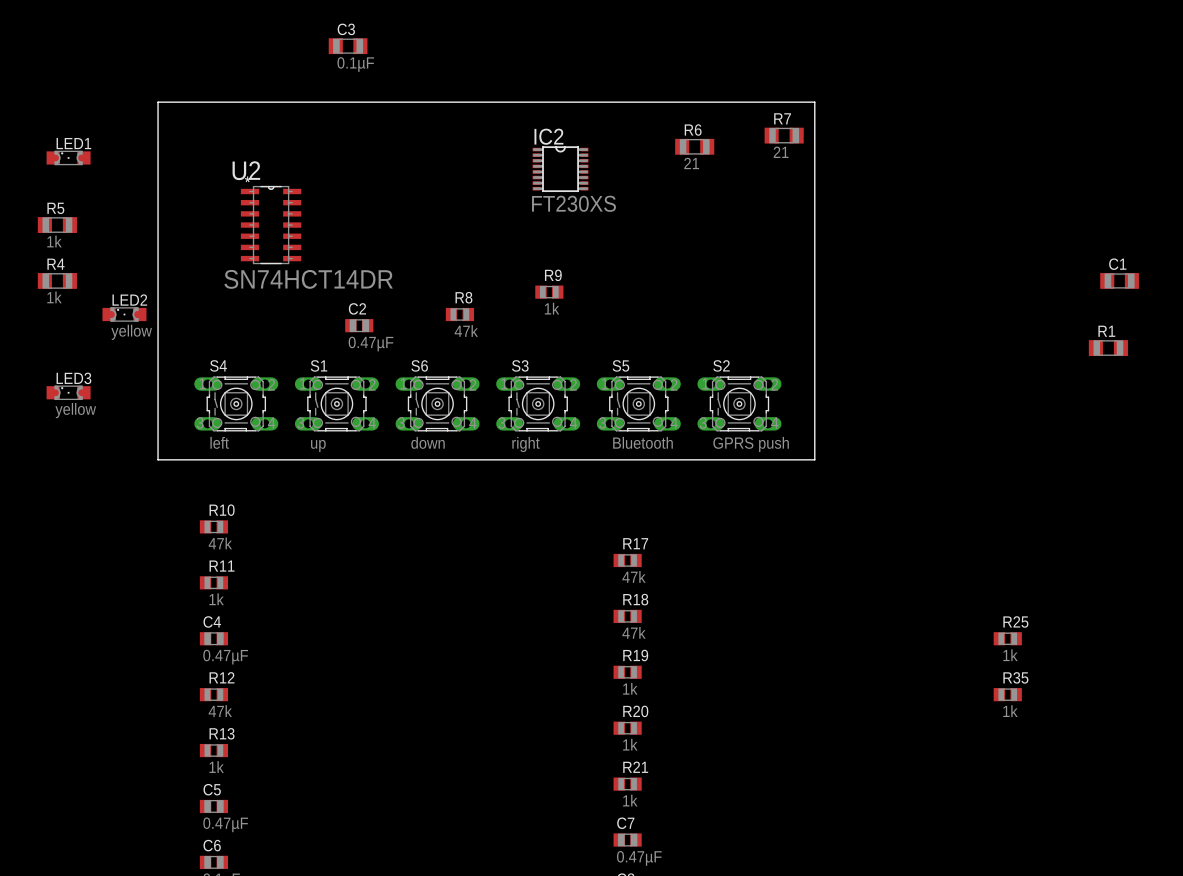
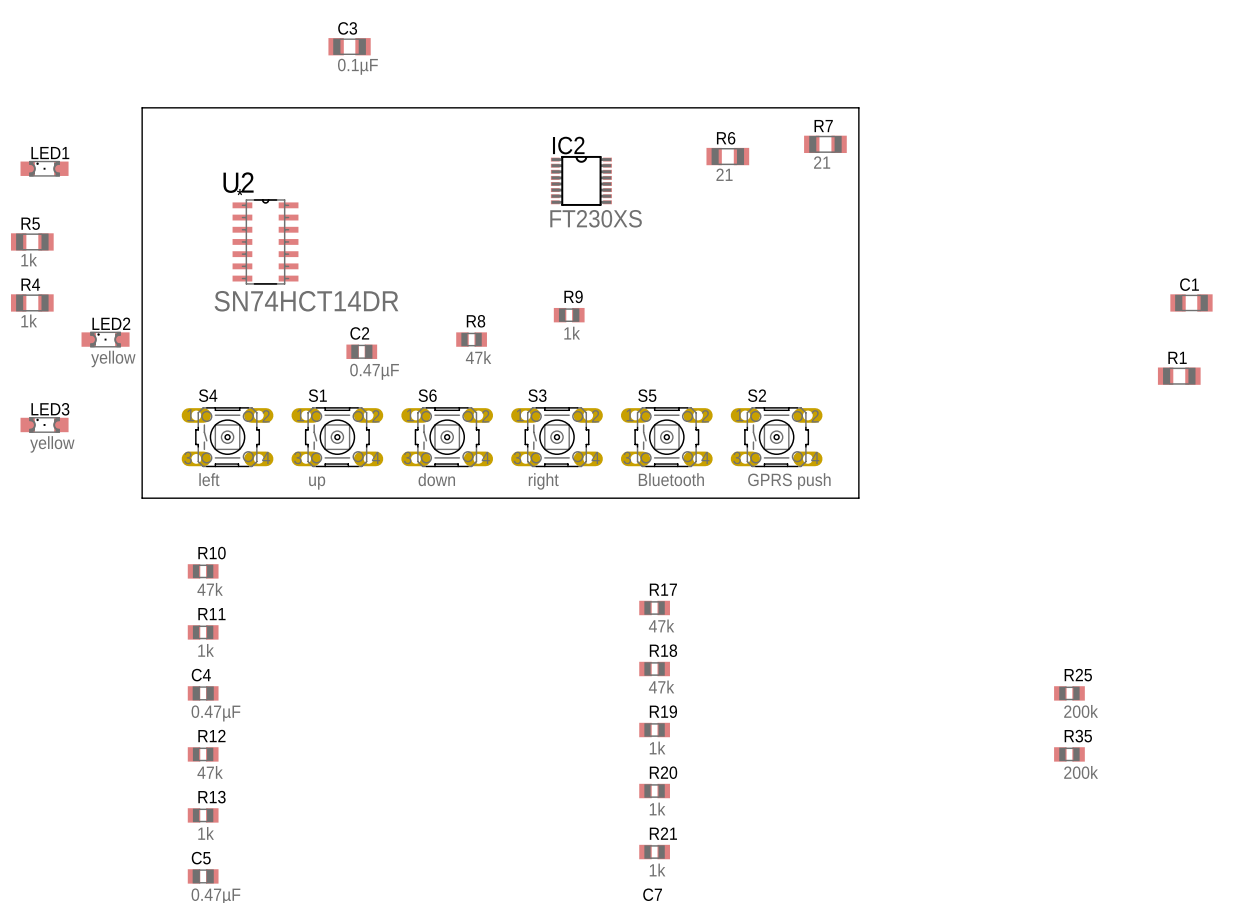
R25 value: 1k (1010, 655) -> 200k (1081, 711)
R35 value: 1k (1010, 711) -> 200k (1081, 772)

